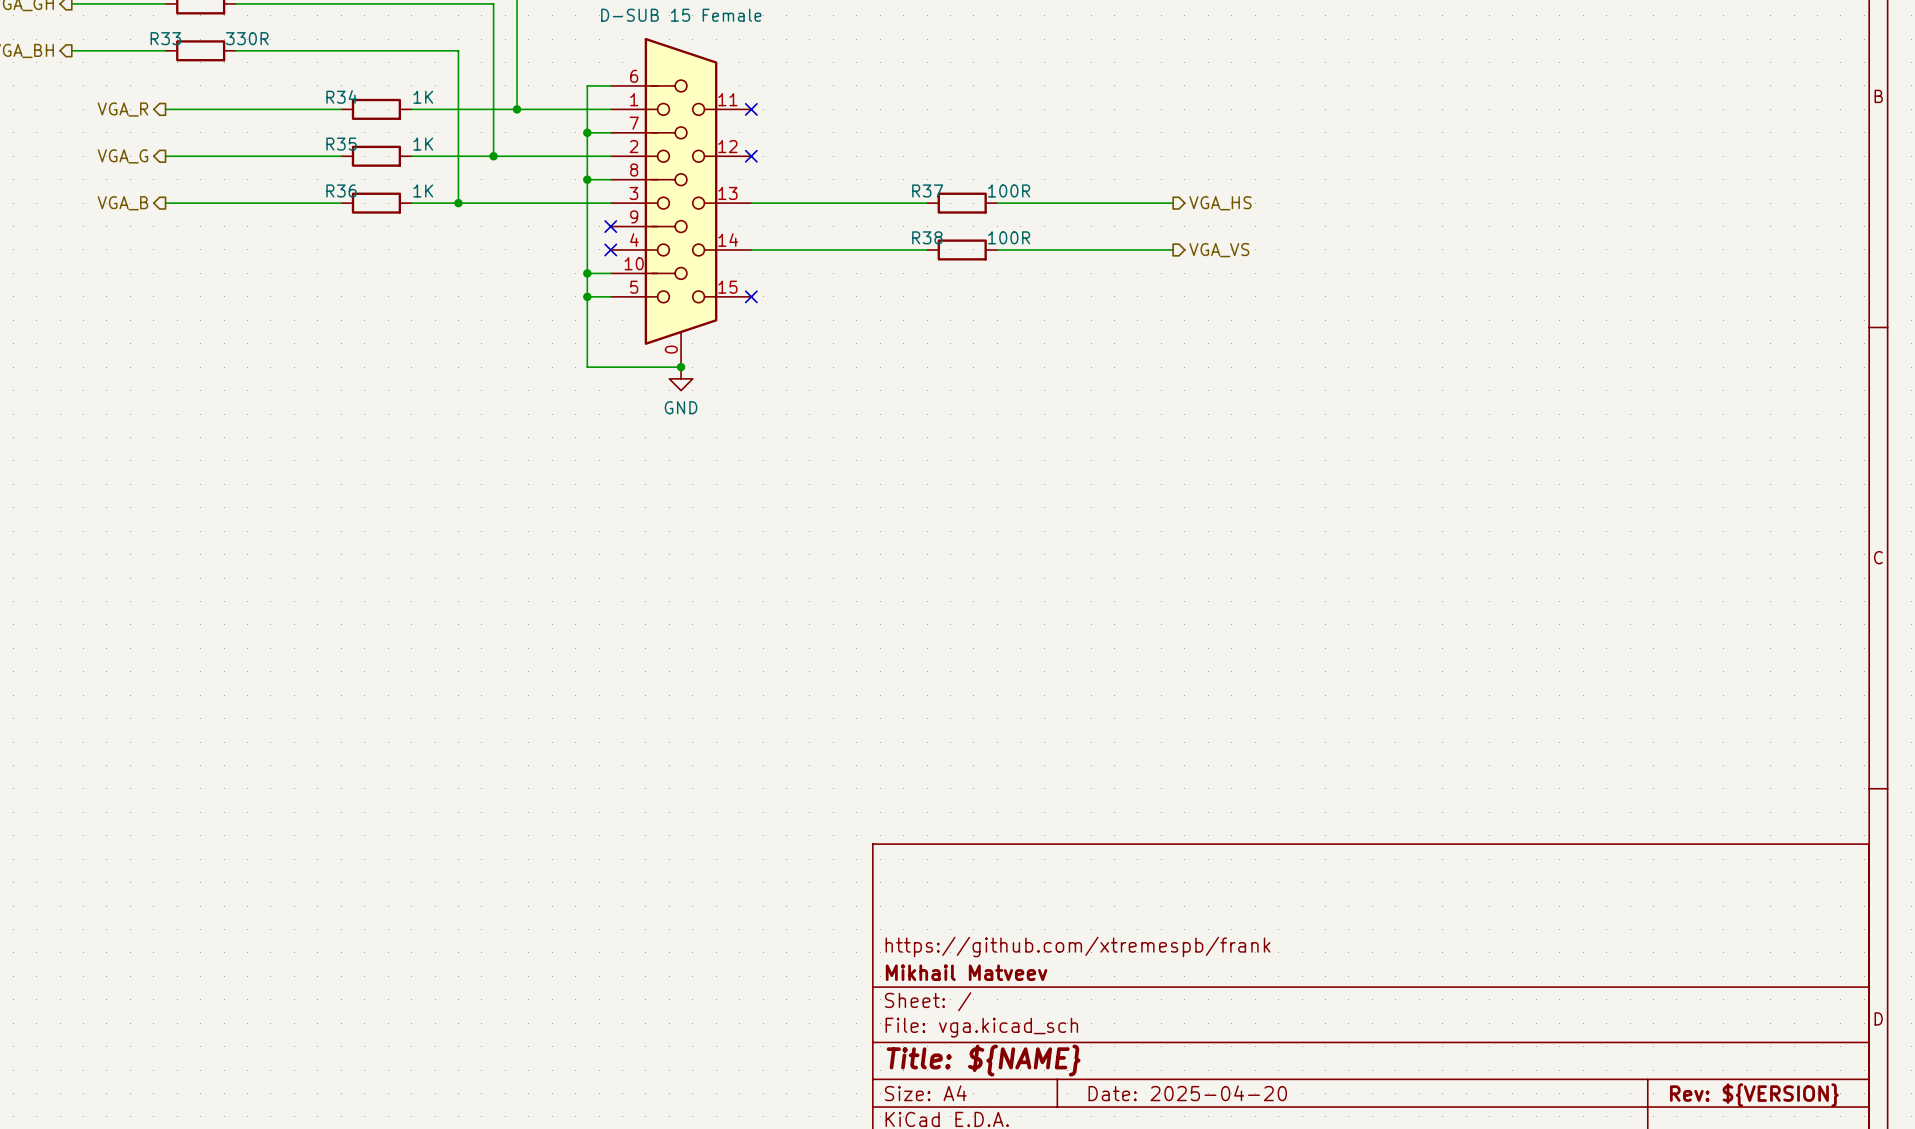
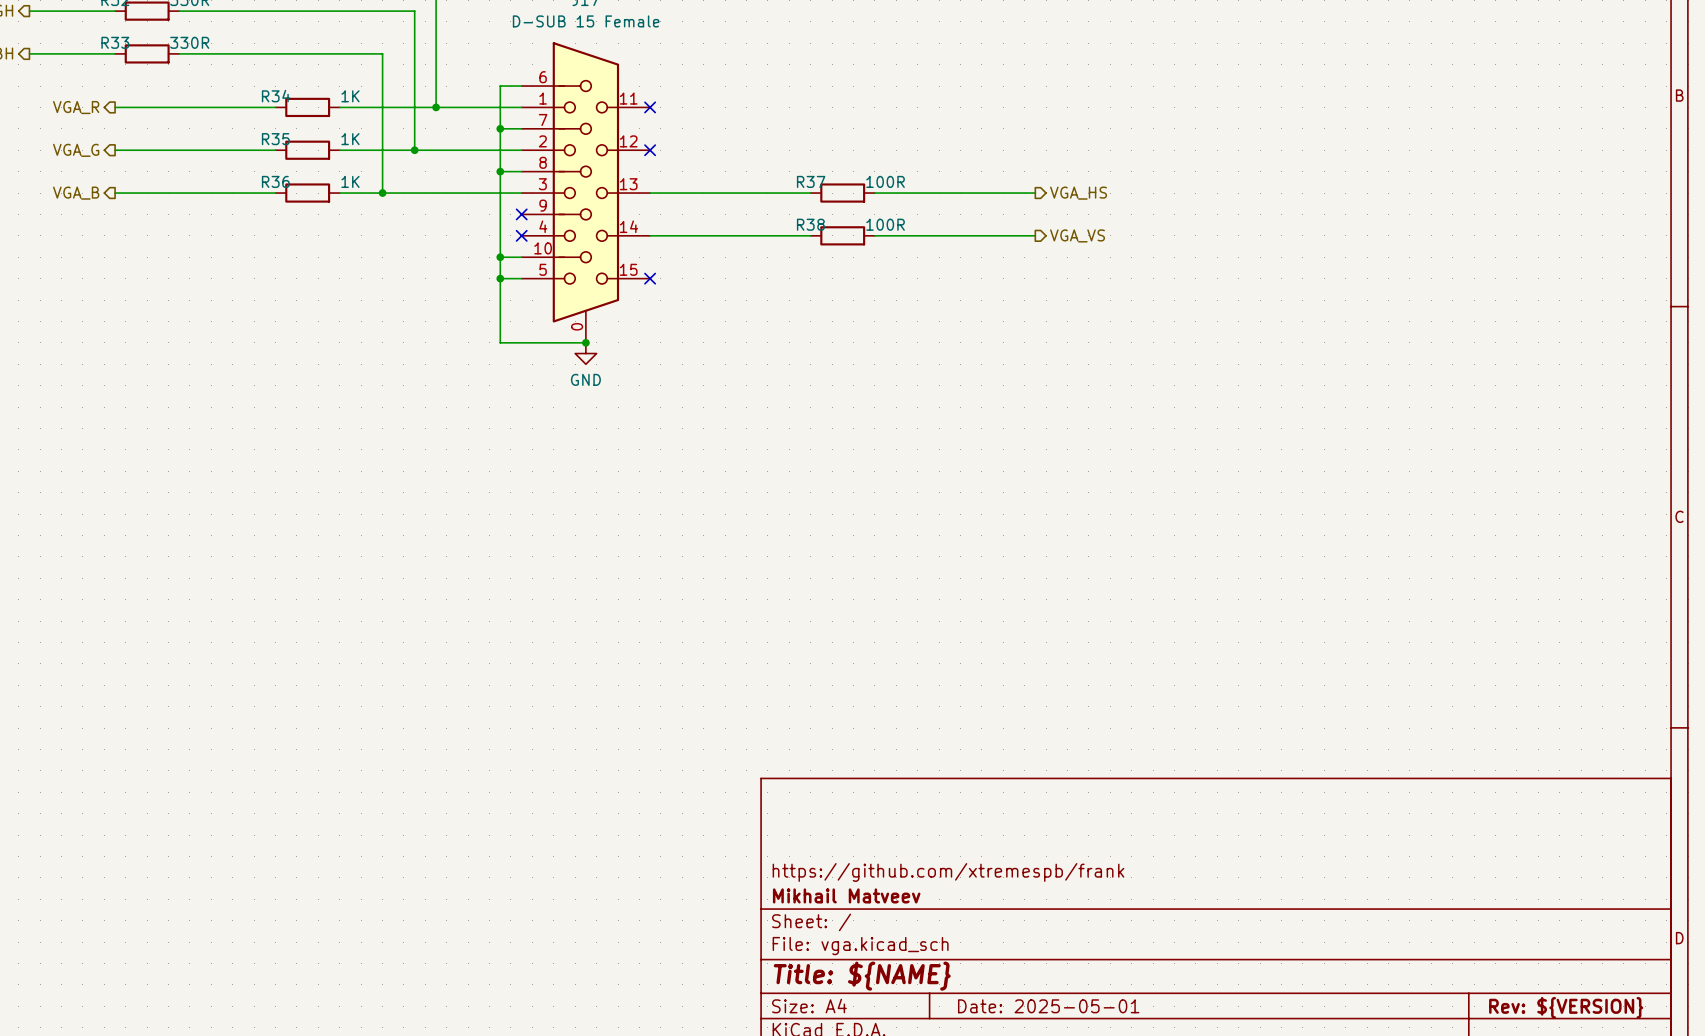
title block: Date: 2025-04-20 (1187, 1093) -> Date: 2025-05-01 (1048, 1006)

